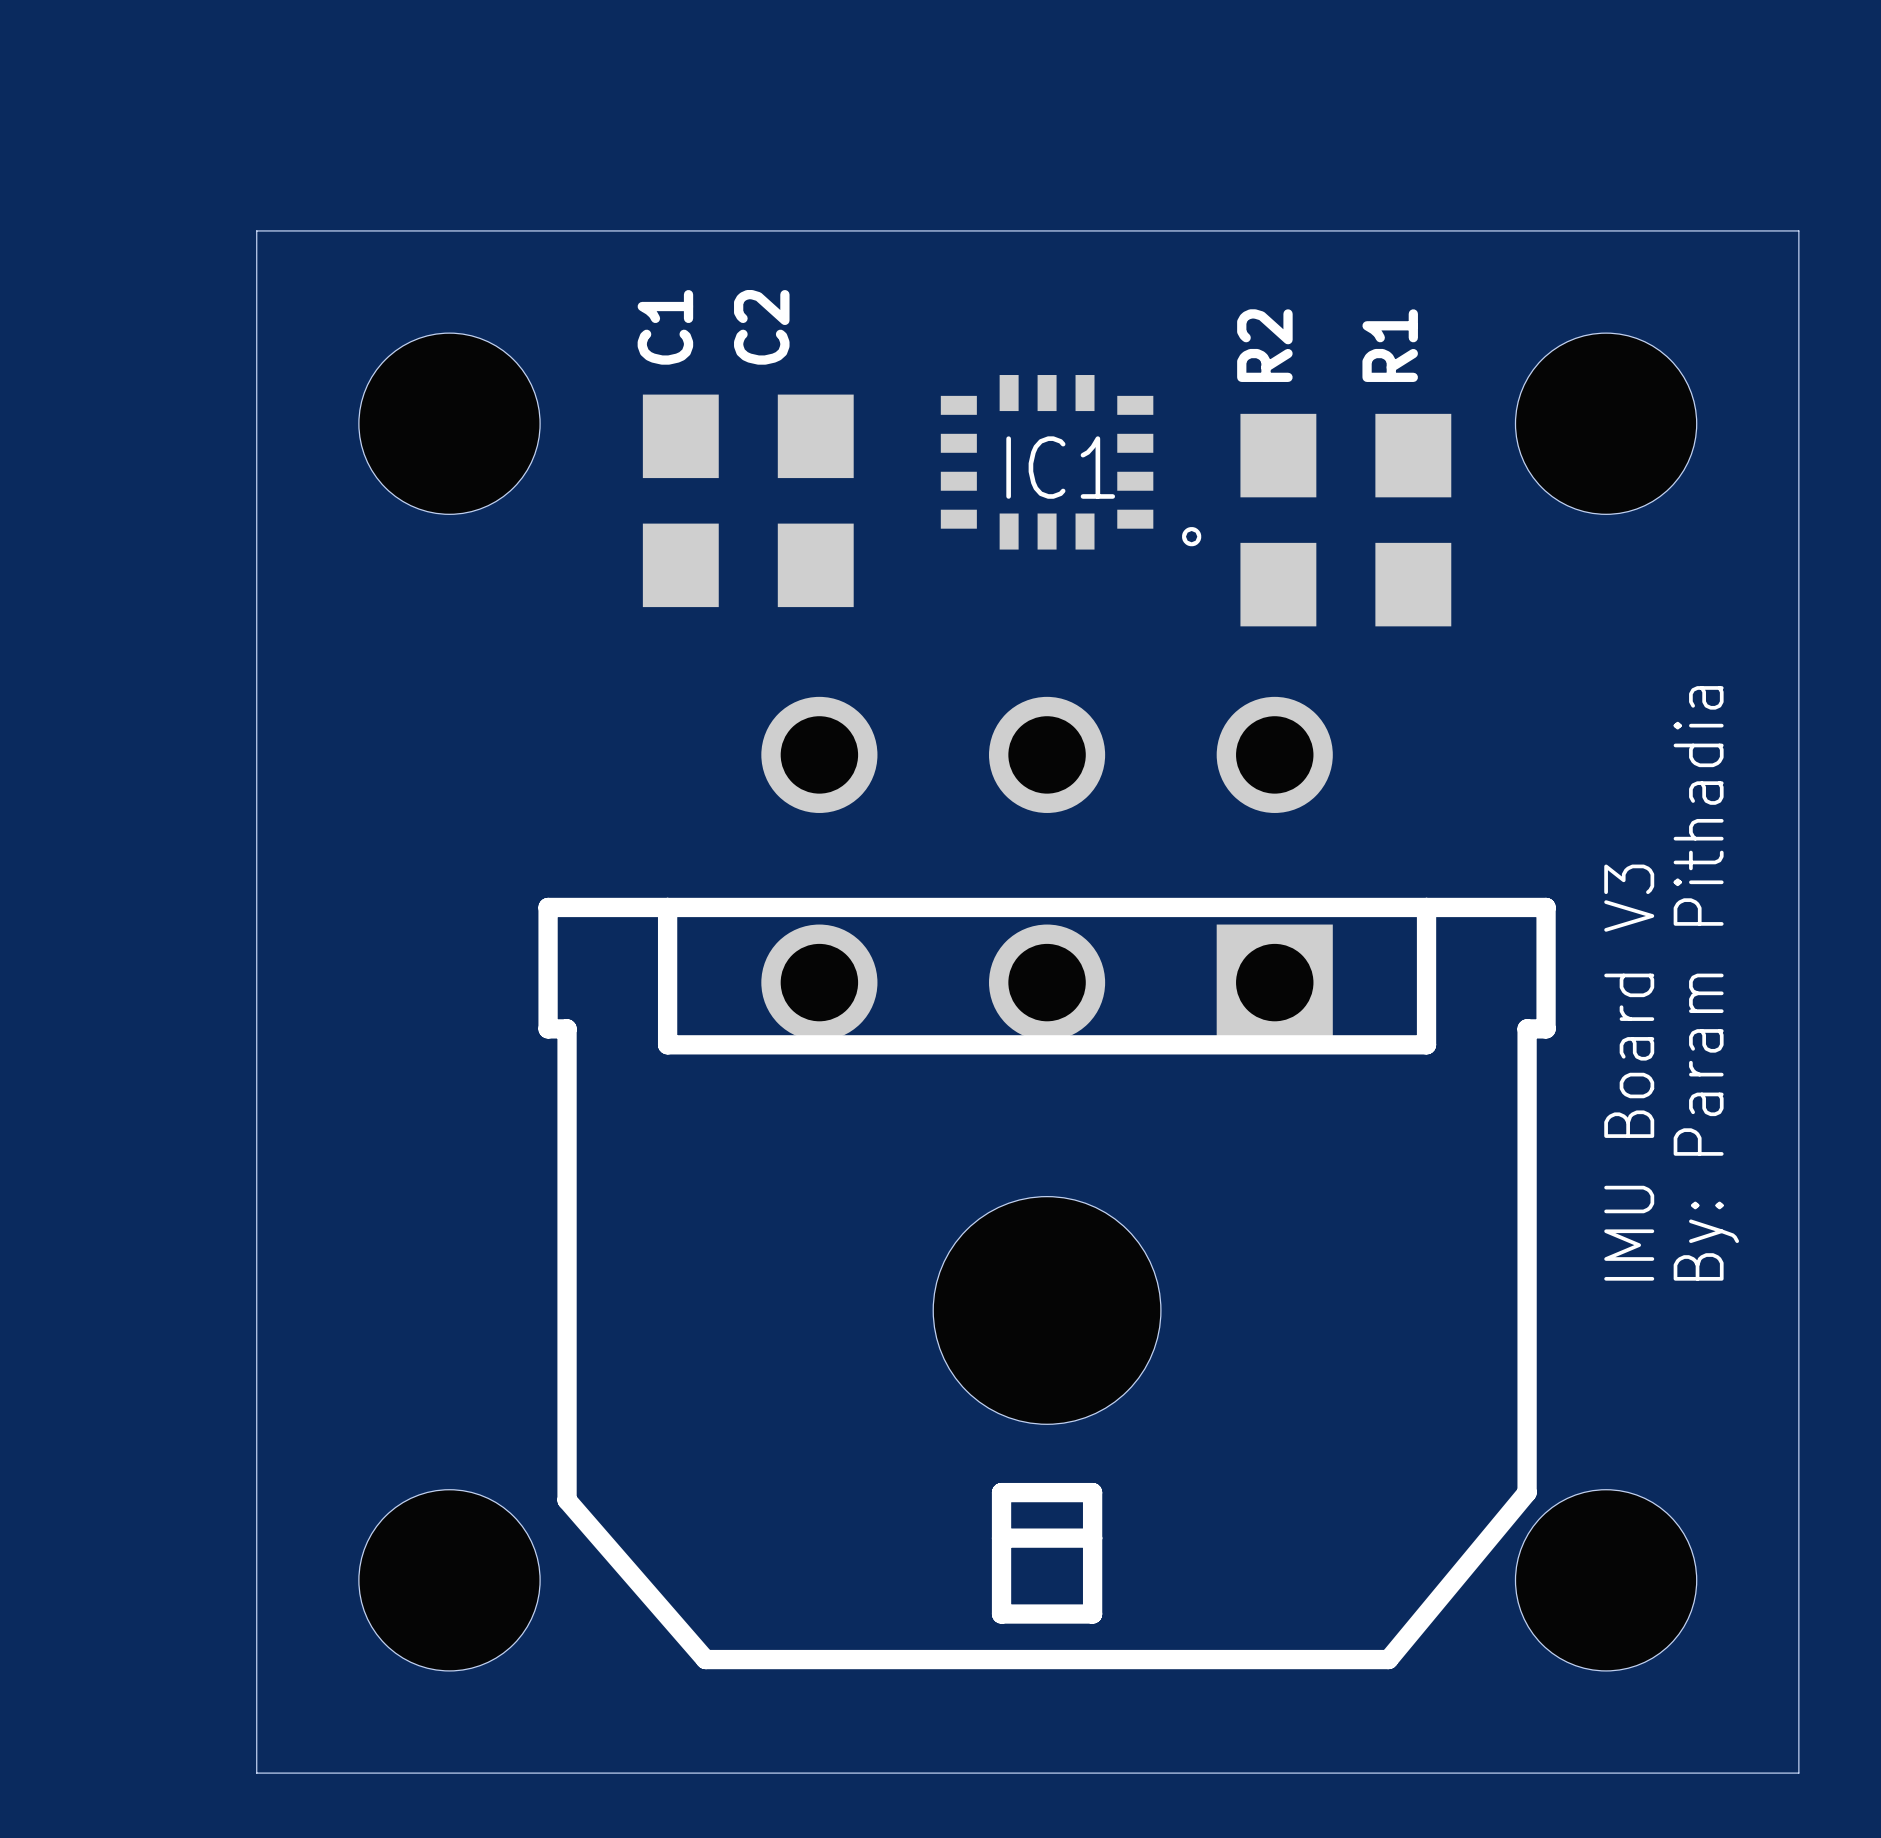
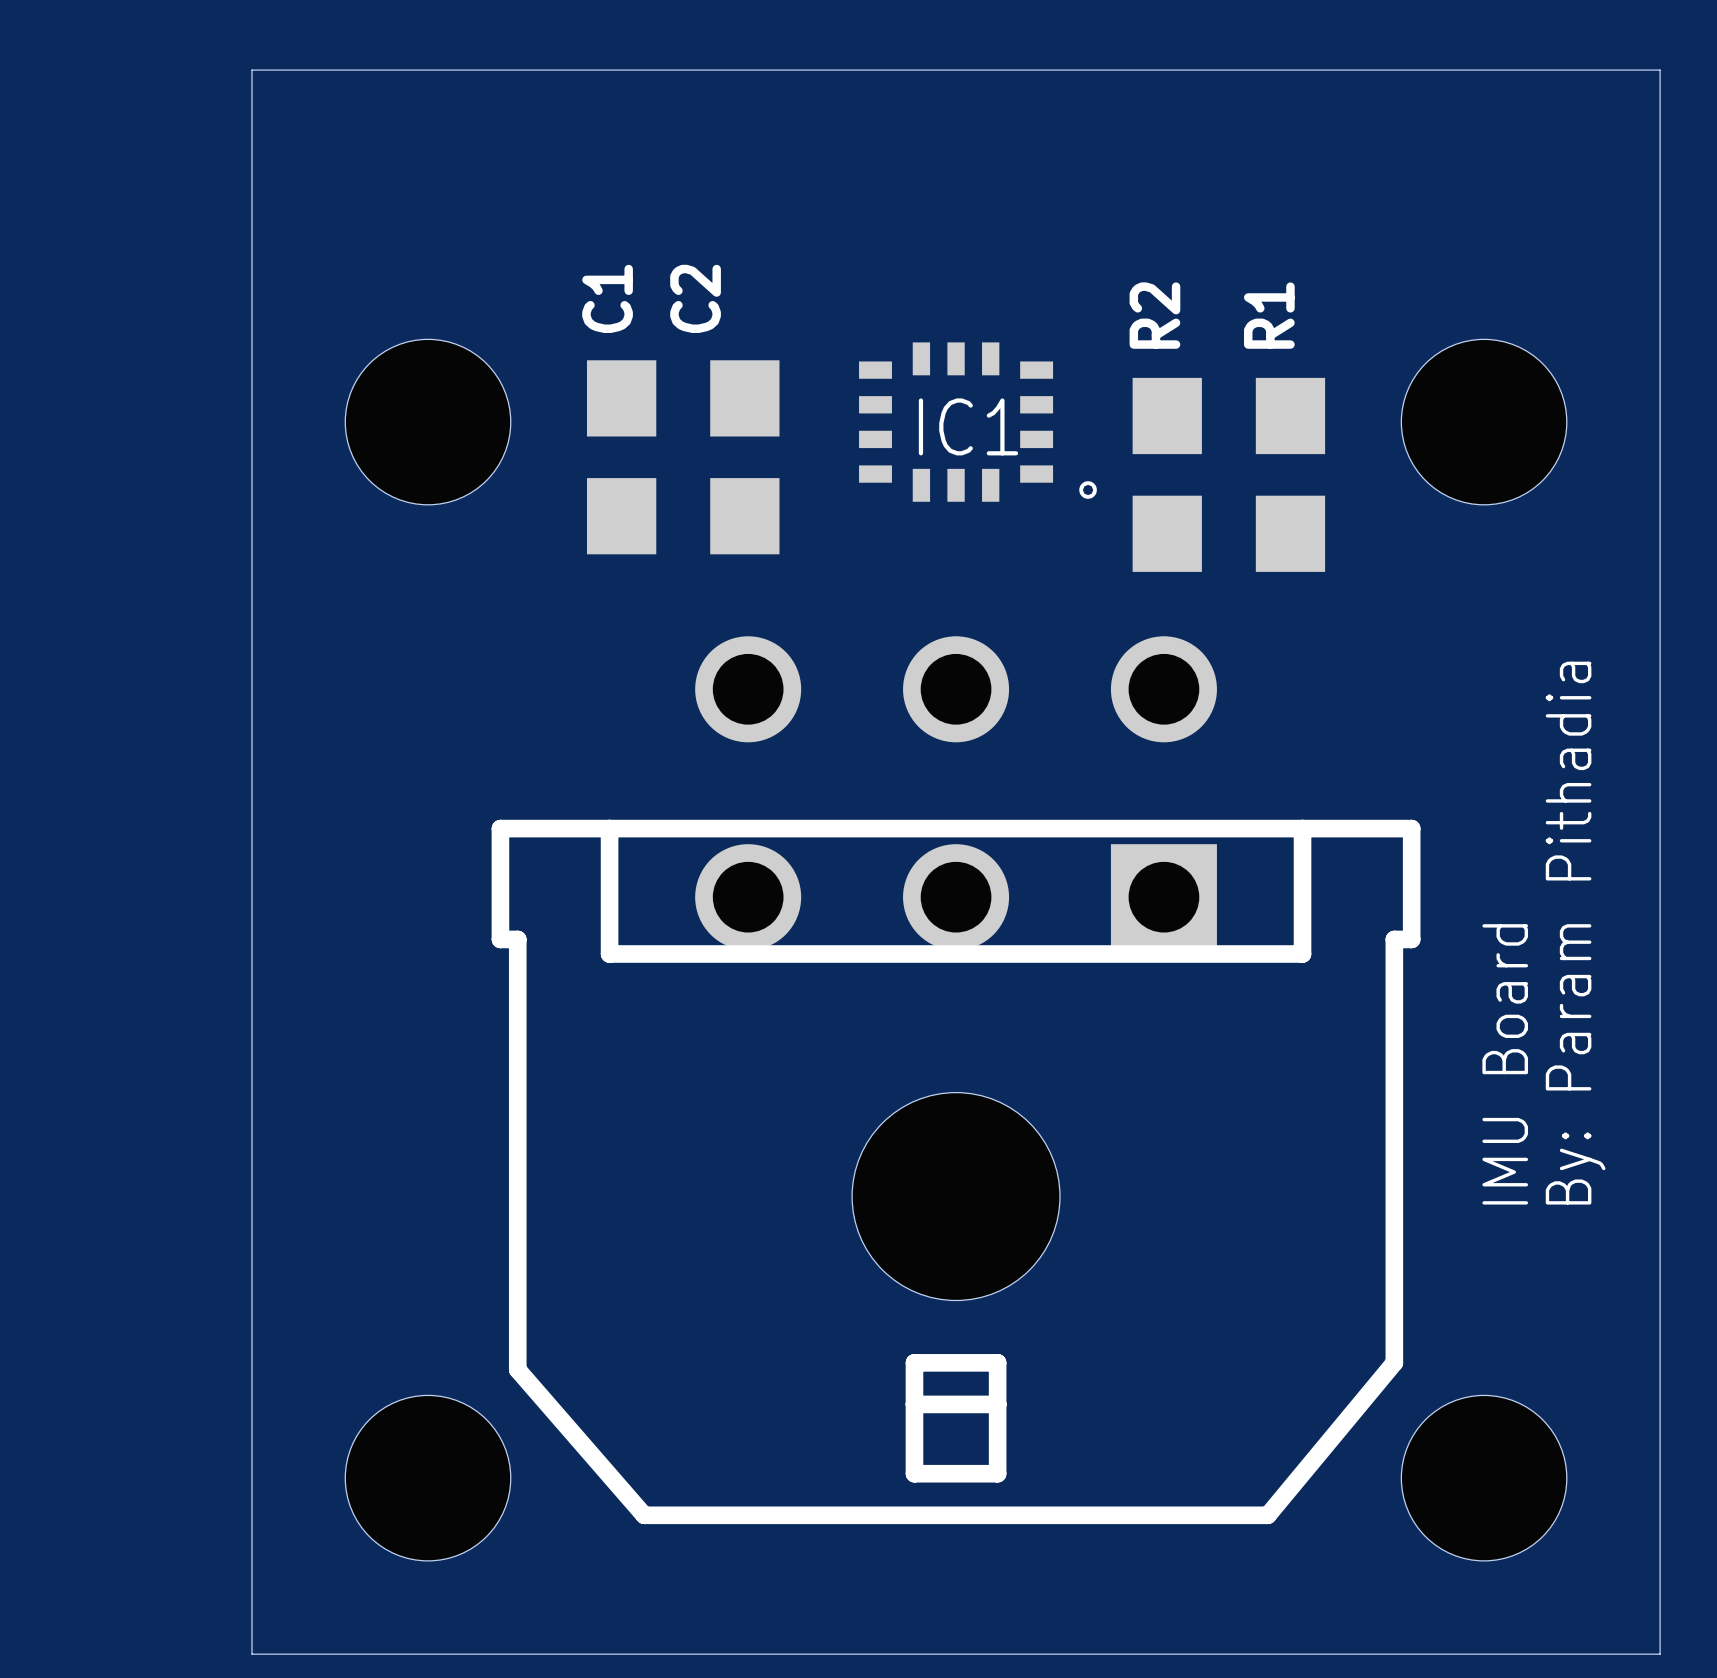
board edge: (256, 230) (1798, 230) (1798, 1773) (256, 1773) (256, 230) -> (252, 70) (252, 1654) (1660, 1654) (1660, 70) (252, 70)
hole position: (449, 423) -> (428, 422)
hole position: (1606, 423) -> (1484, 422)
text position: By: Param Pithadia (1706, 983) -> By: Param Pithadia (1575, 933)
text: IMU Board V3 (1629, 1072) -> IMU Board (1505, 1064)
hole position: (449, 1580) -> (428, 1478)
hole position: (1606, 1580) -> (1484, 1478)

